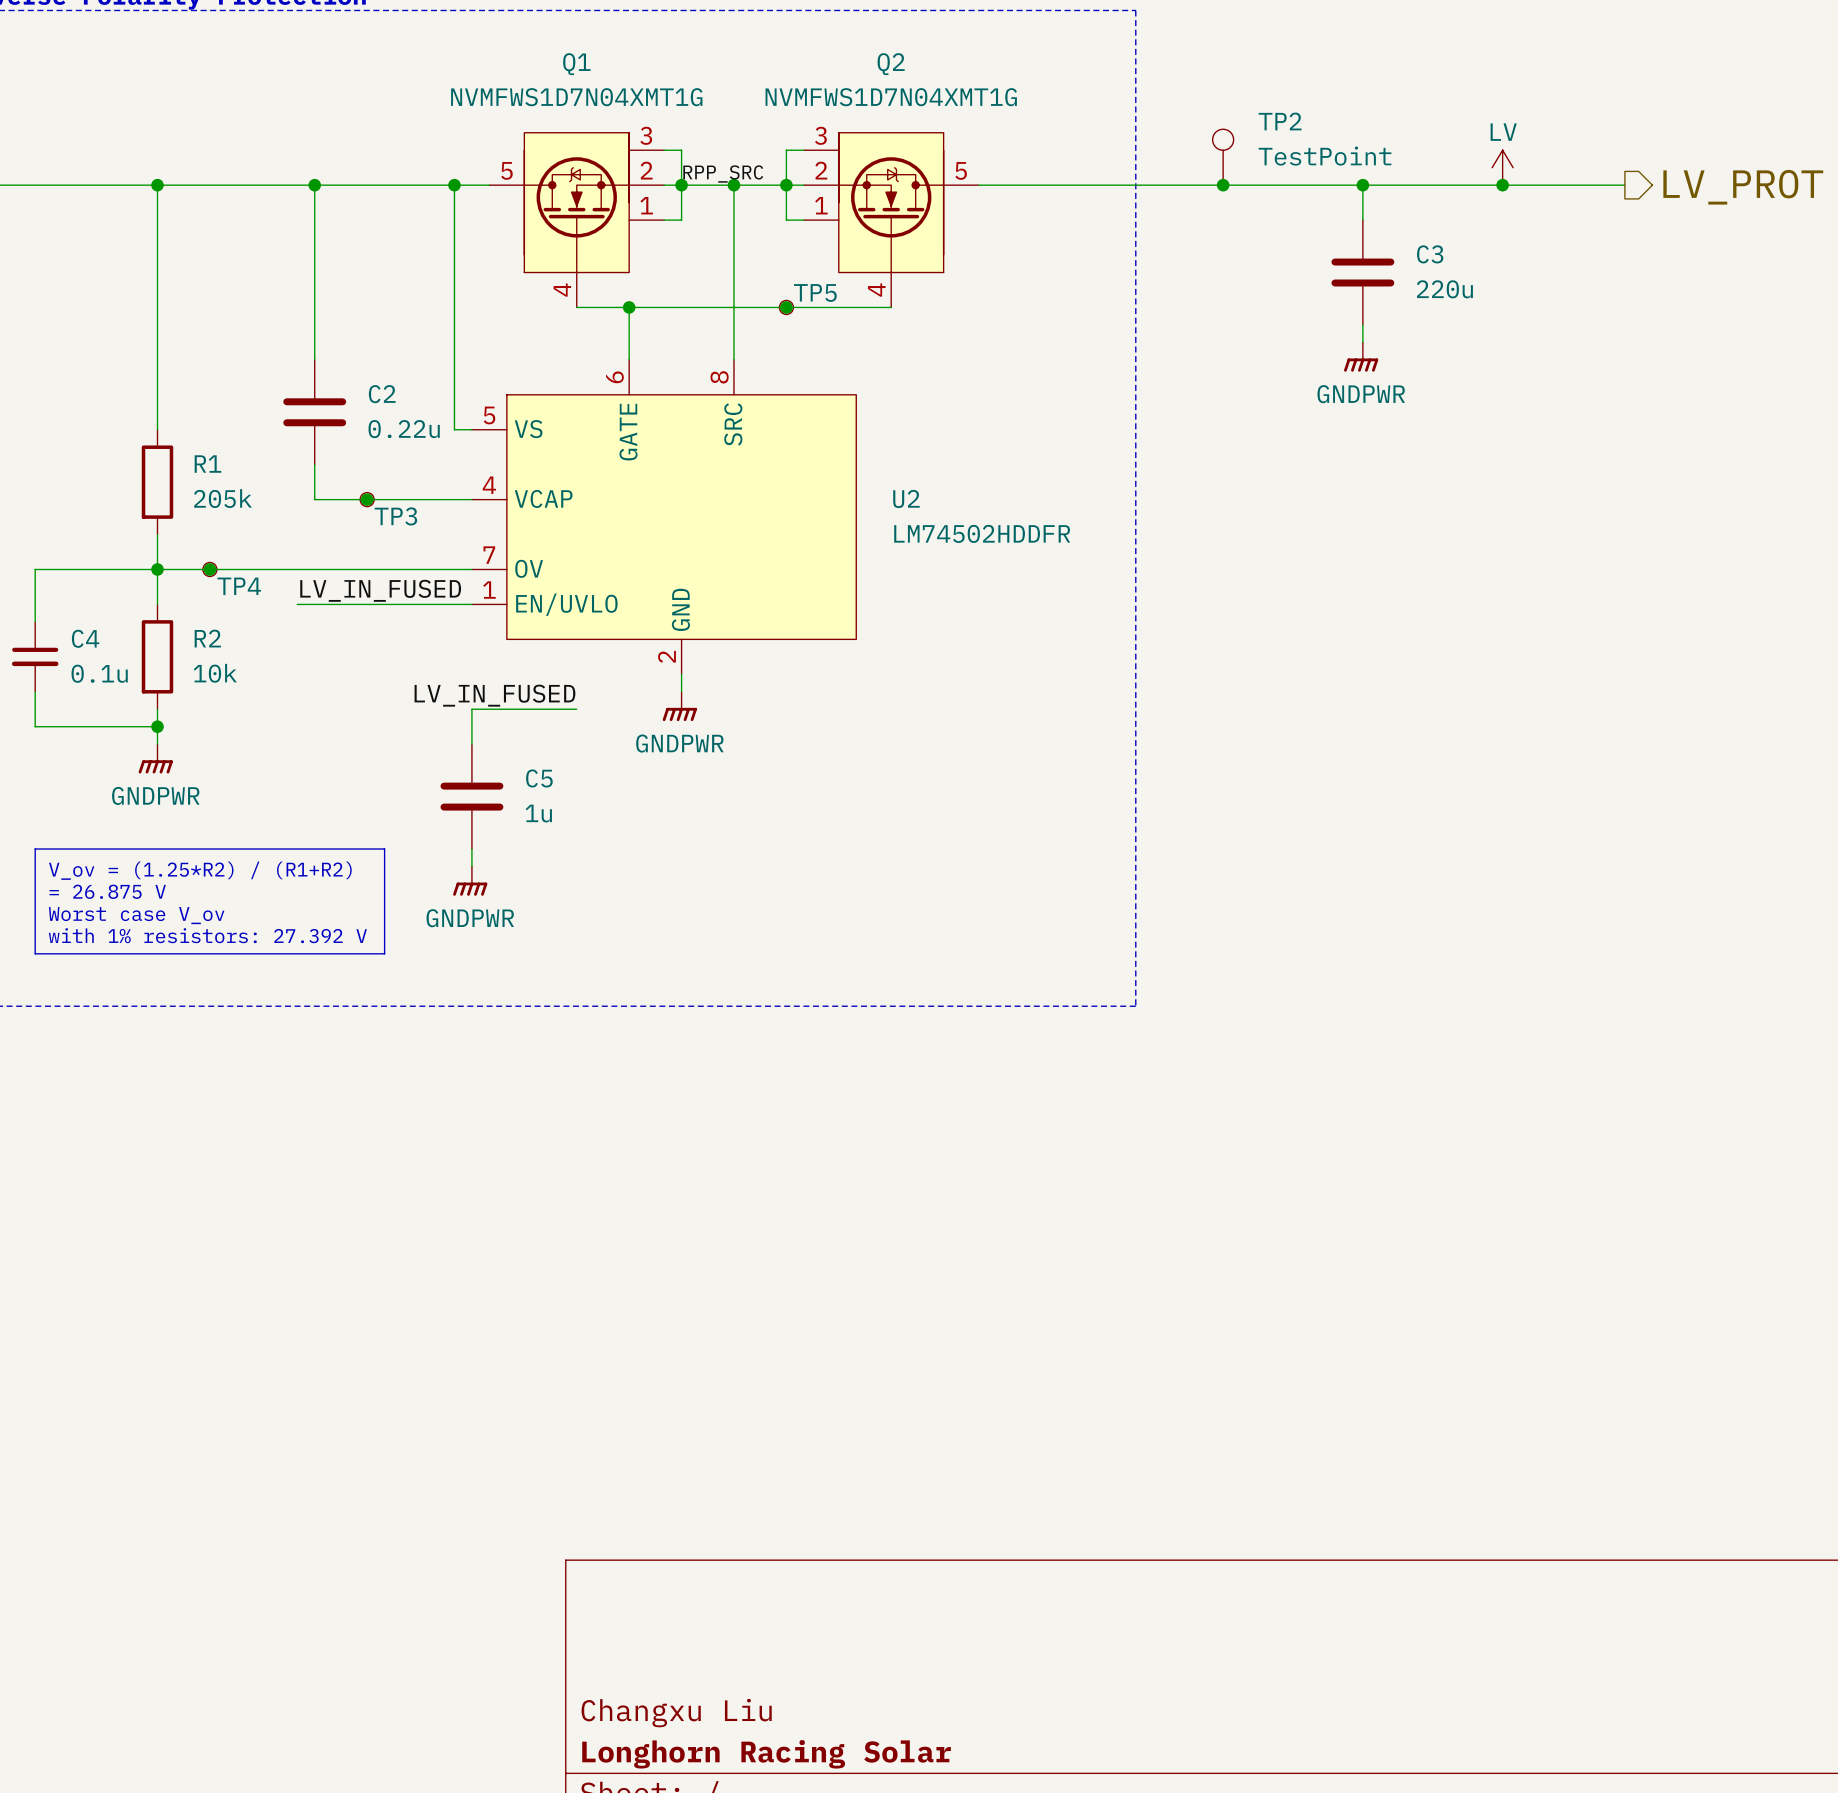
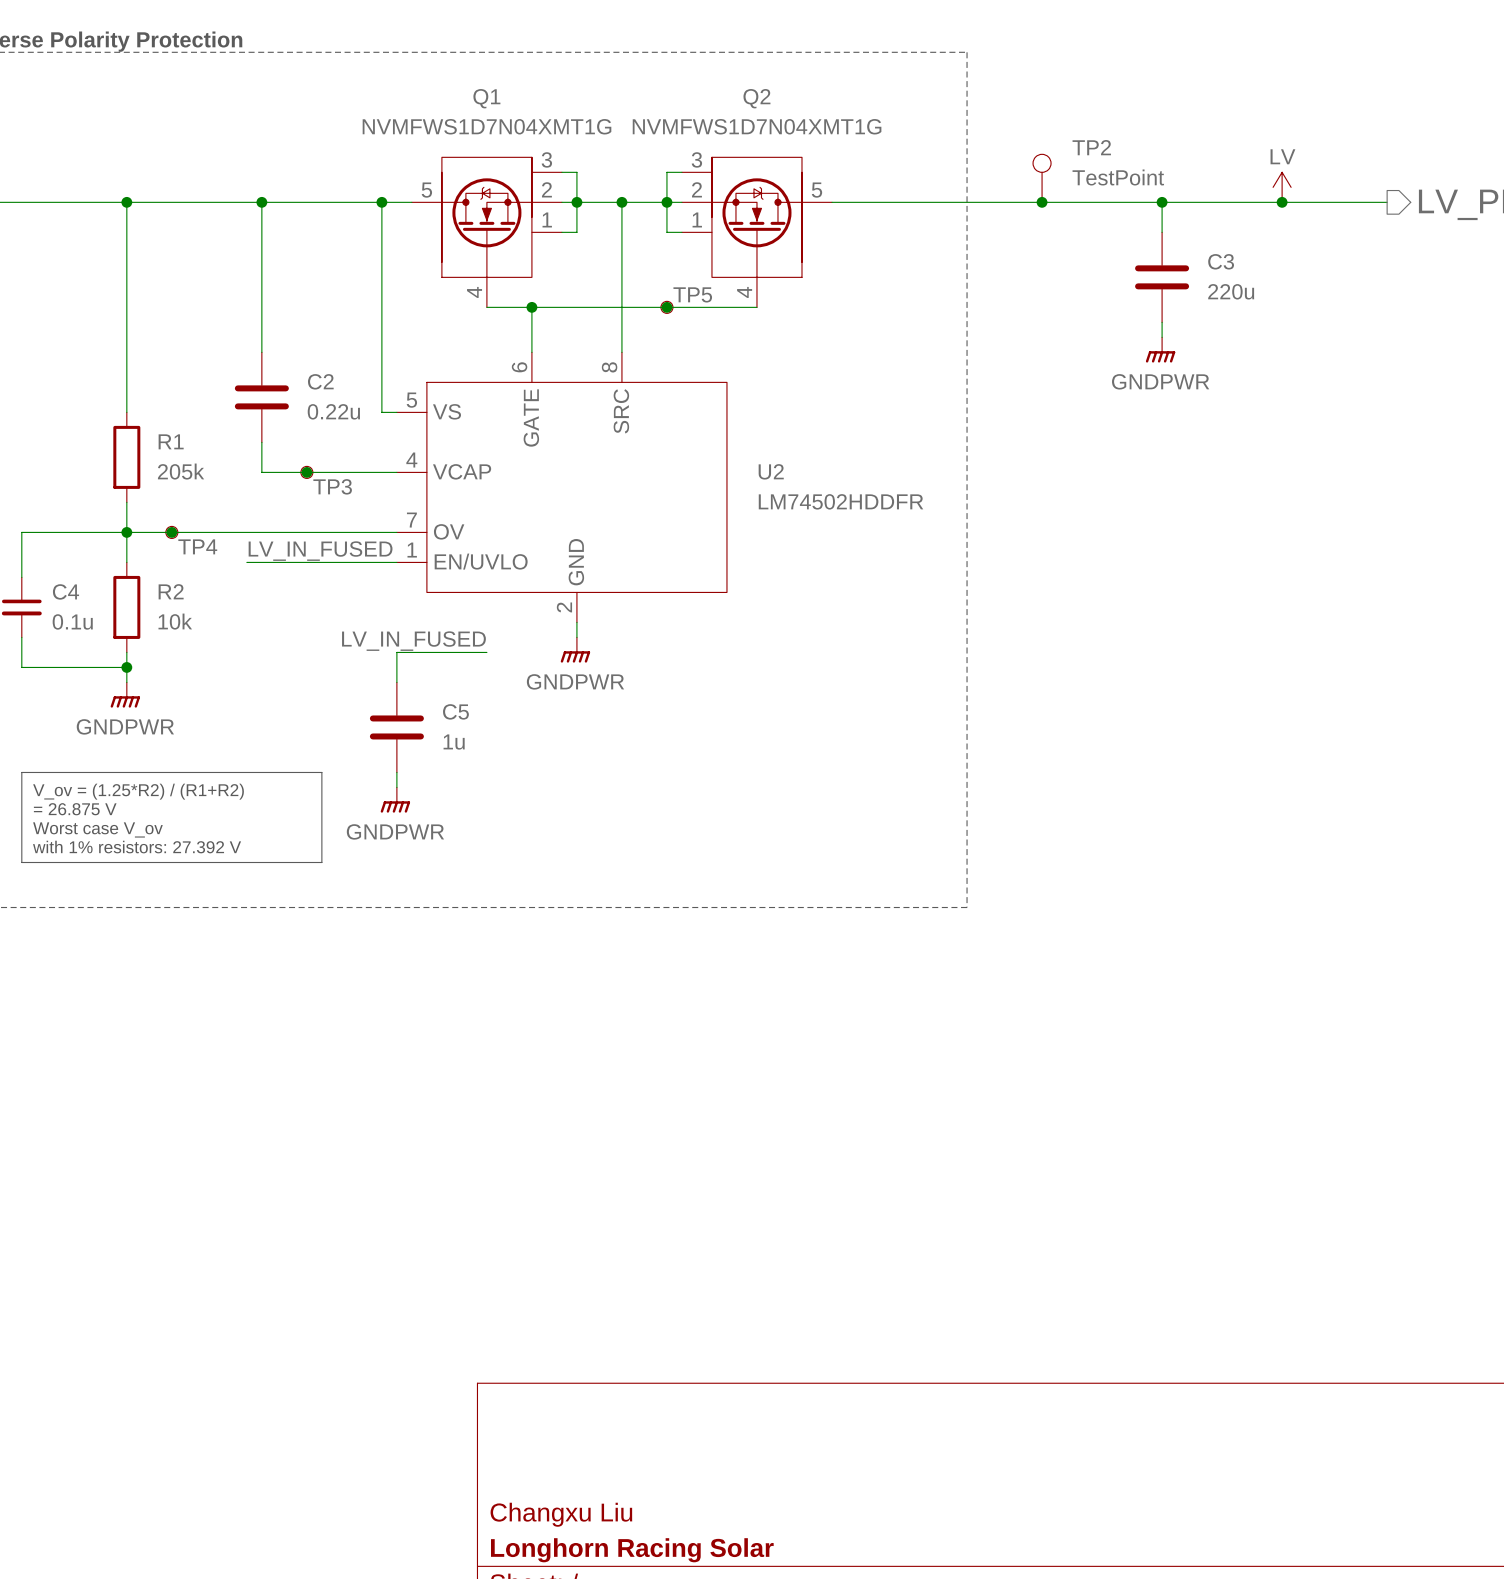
label: RPP_SRC (723, 173) -> none

